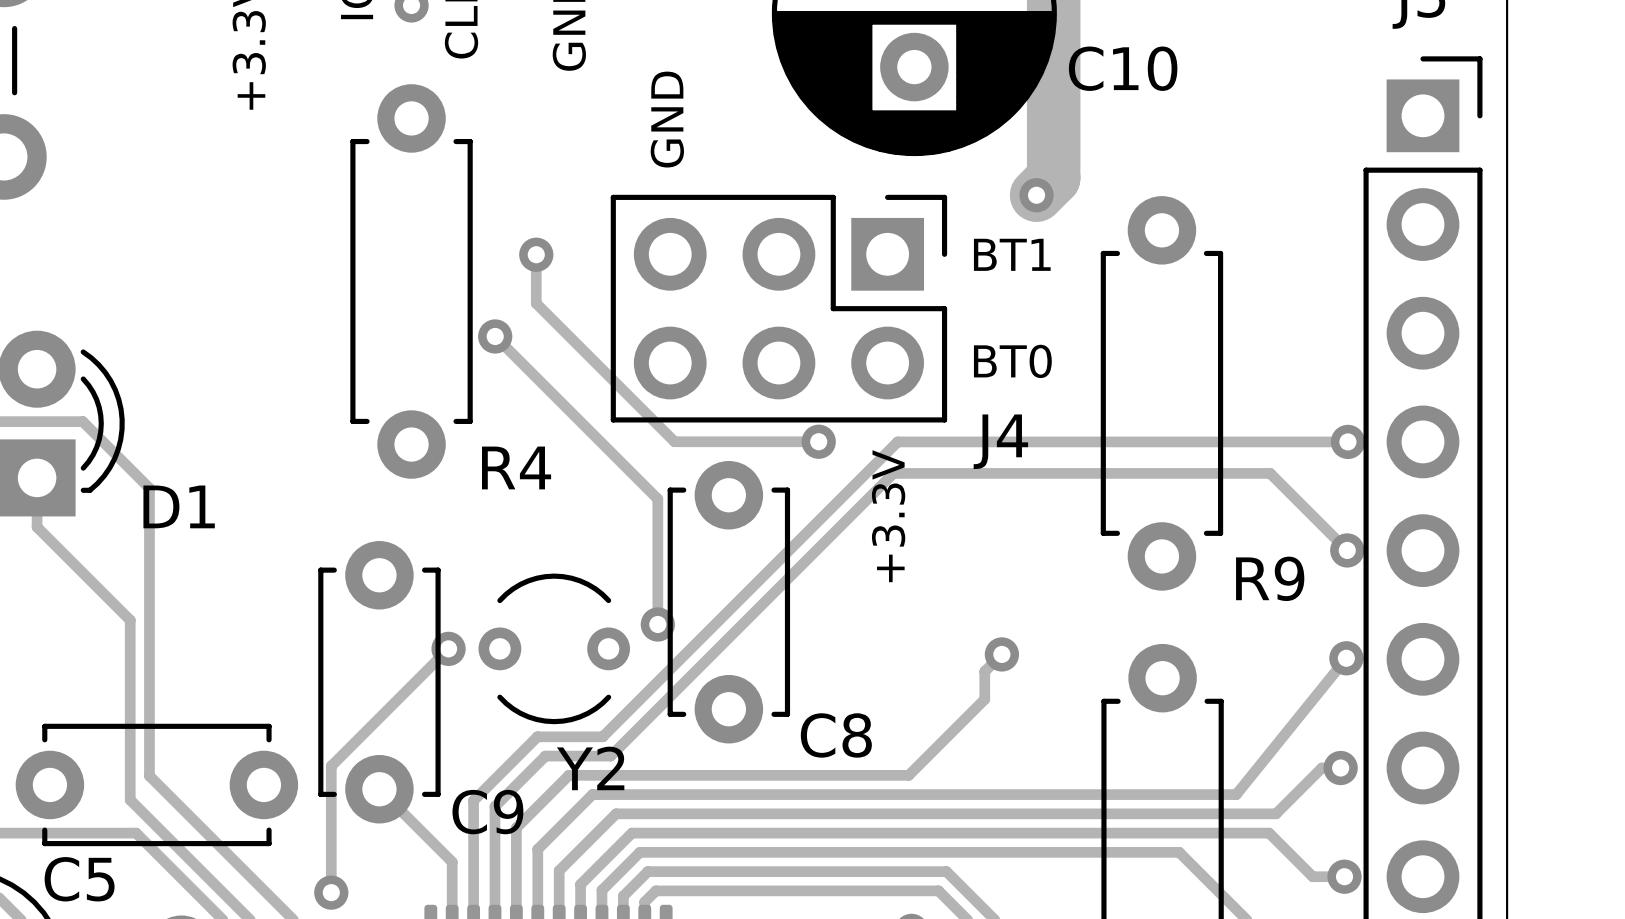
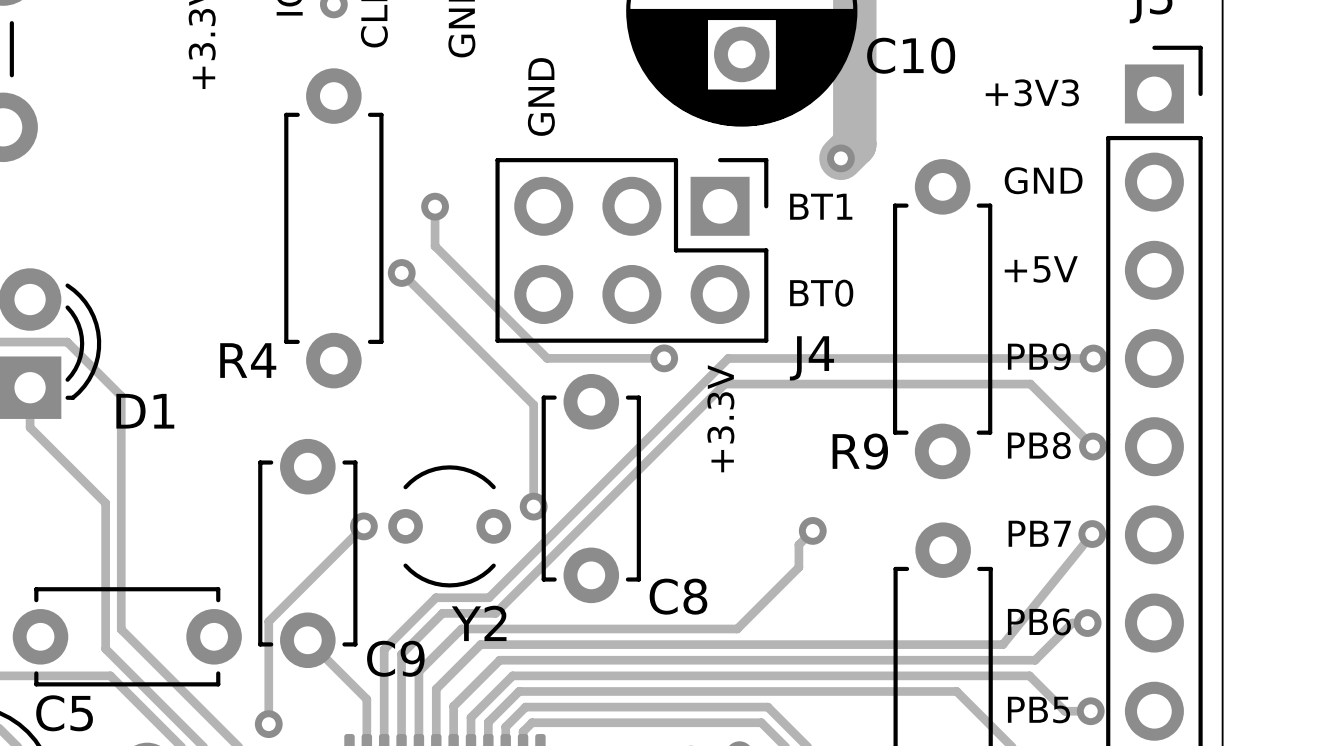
text: none -> +3V3 (1032, 92)
text: none -> GND (1043, 180)
text: none -> +5V (1041, 269)
text: none -> PB9 (1039, 356)
R4 name position: R4 (516, 467) -> R4 (248, 360)
text: none -> PB8 (1039, 445)
R9 name position: R9 (1270, 578) -> R9 (860, 451)
text: none -> PB7 (1039, 533)
text: none -> PB6 (1039, 621)
text: none -> PB5 (1038, 710)

